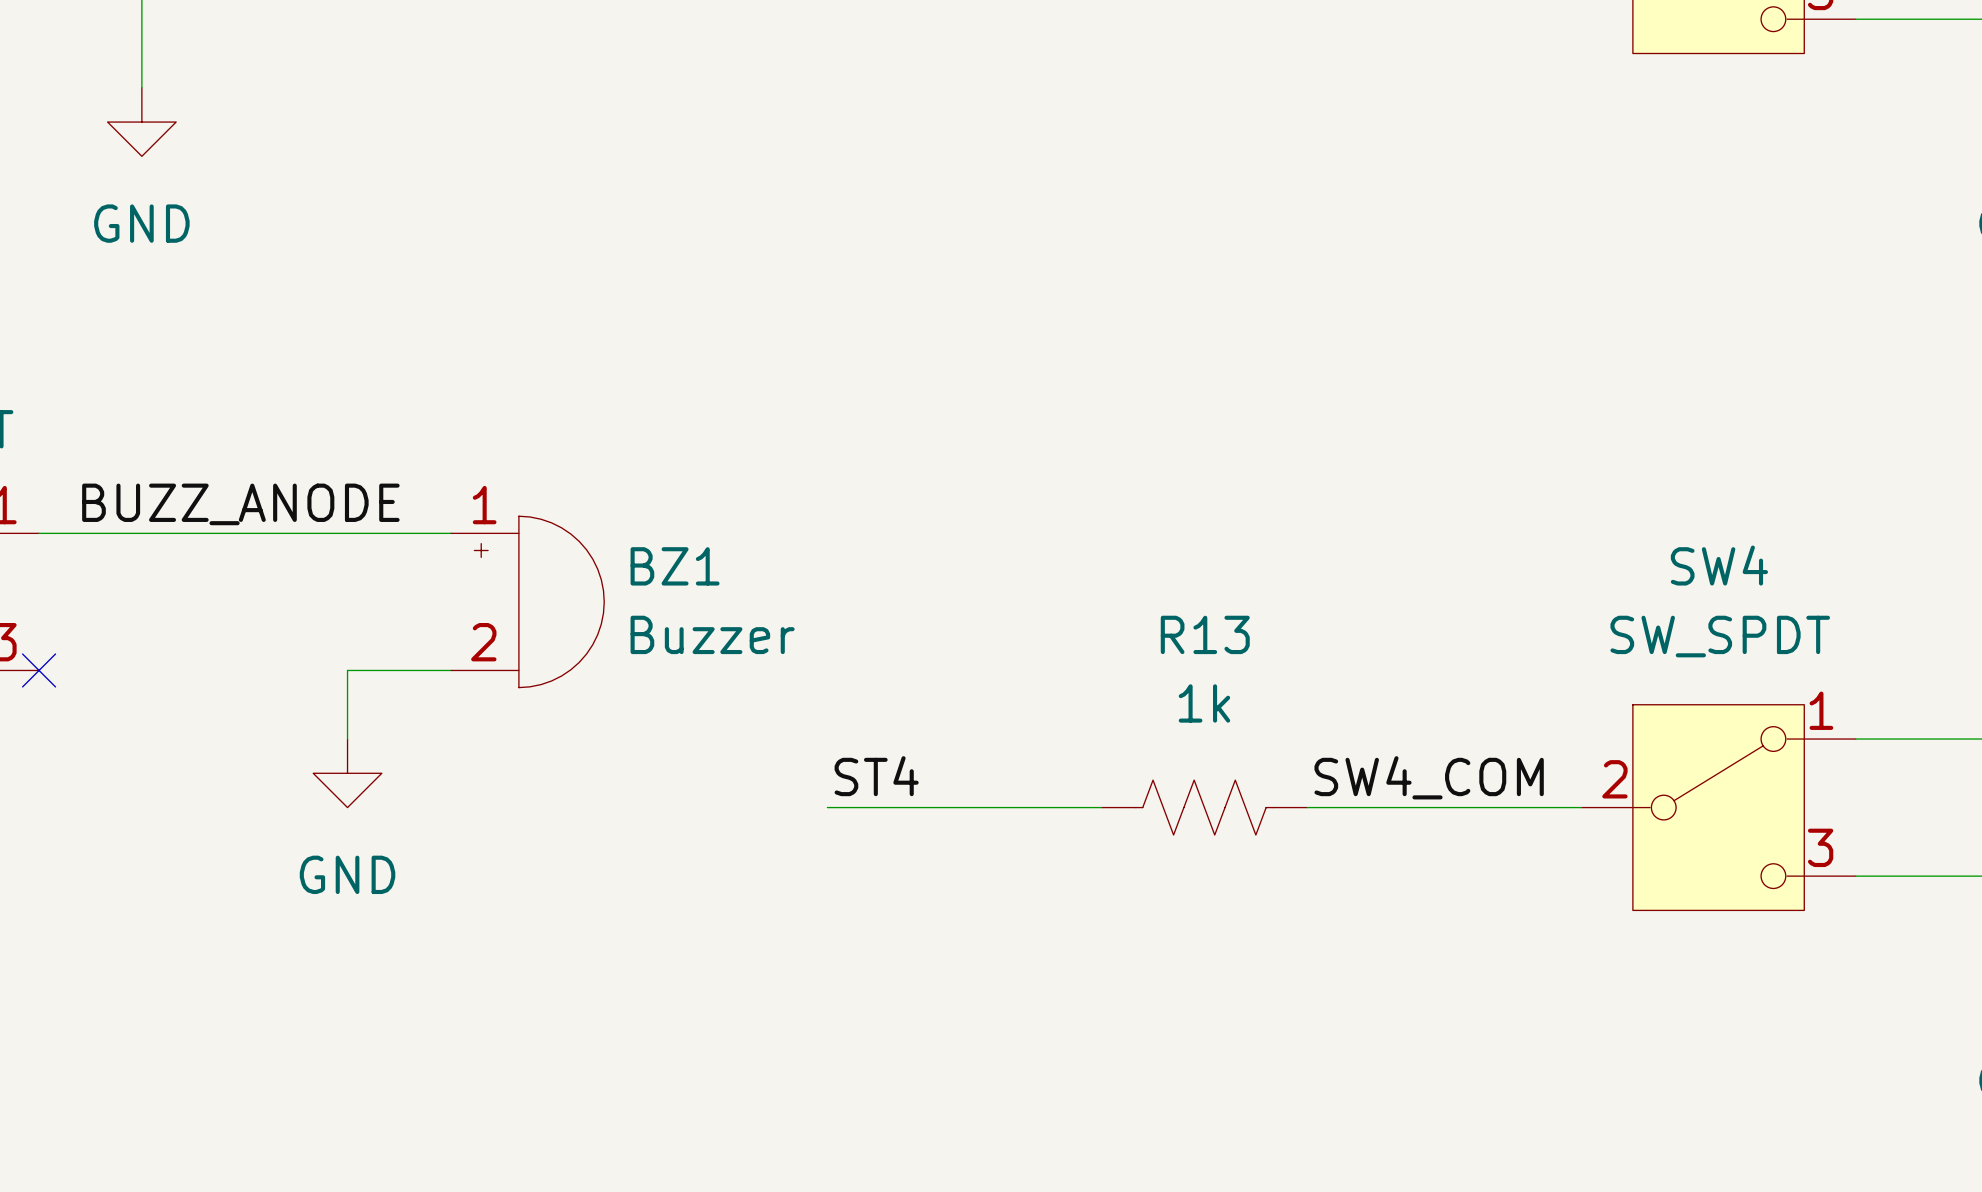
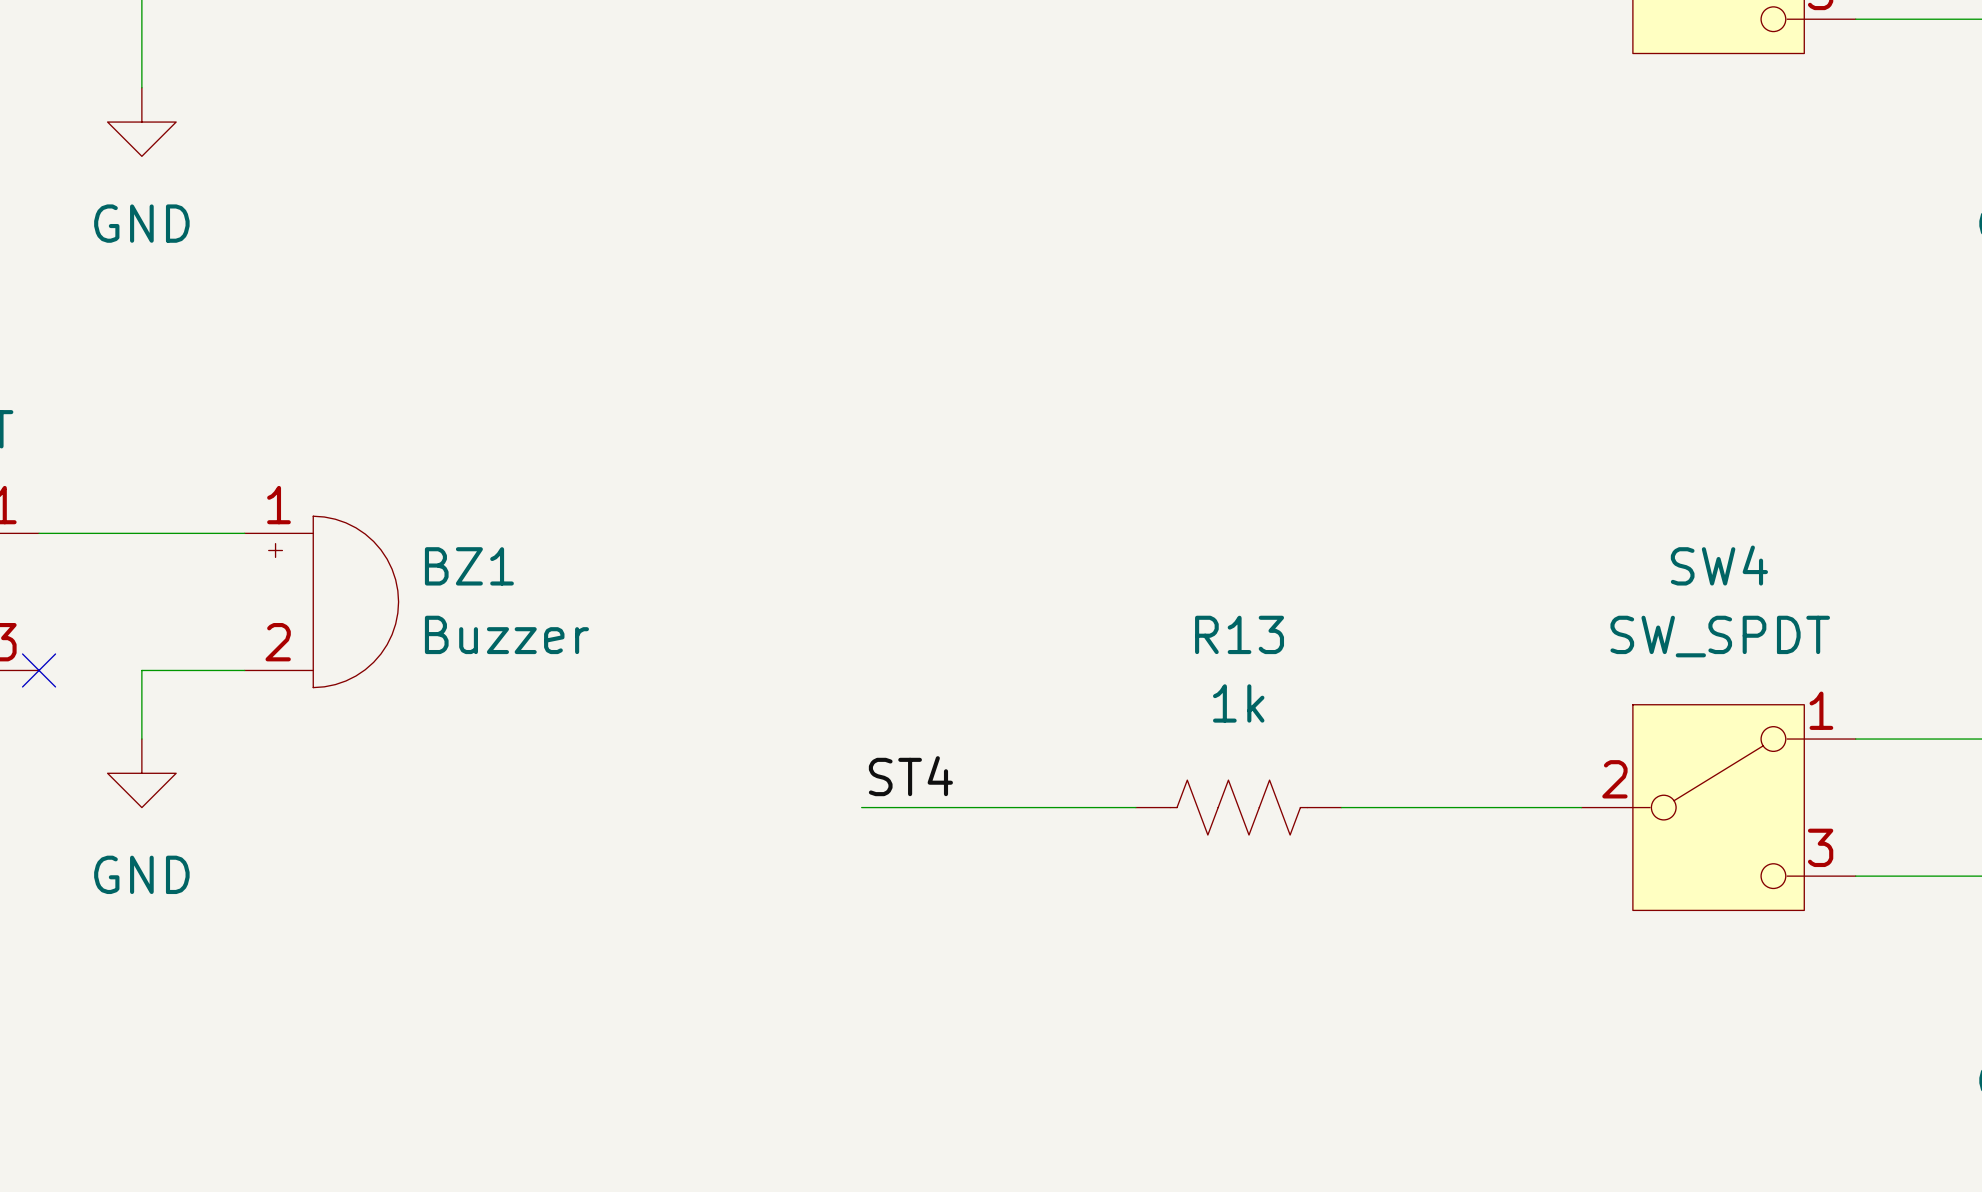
label: BUZZ_ANODE (240, 504) -> none
wire: (244, 533) (450, 533) -> none
BZ1 position: (527, 601) -> (321, 601)
wire: (450, 670) (347, 670) (347, 739) -> (244, 670) (141, 670) (141, 739)
power symbol position: GND (347, 773) -> GND (141, 773)
label position: ST4 (876, 776) -> ST4 (910, 776)
label: SW4_COM (1429, 777) -> none
wire: (827, 807) (861, 807) -> none
R13 position: (1204, 807) -> (1238, 807)

